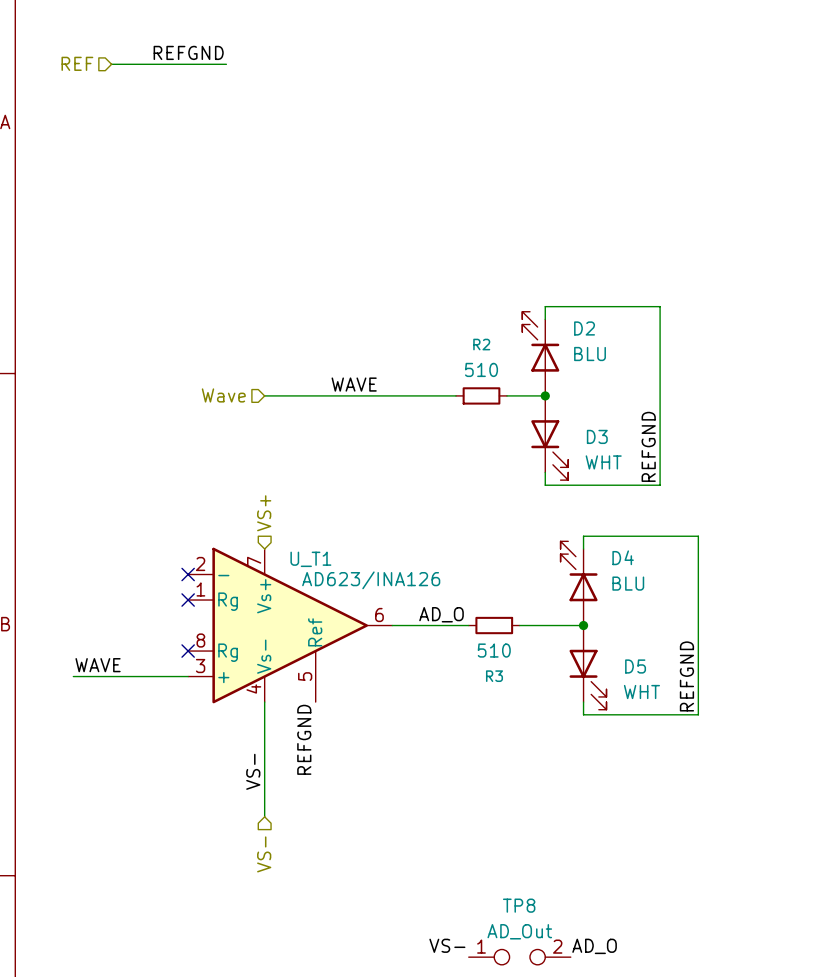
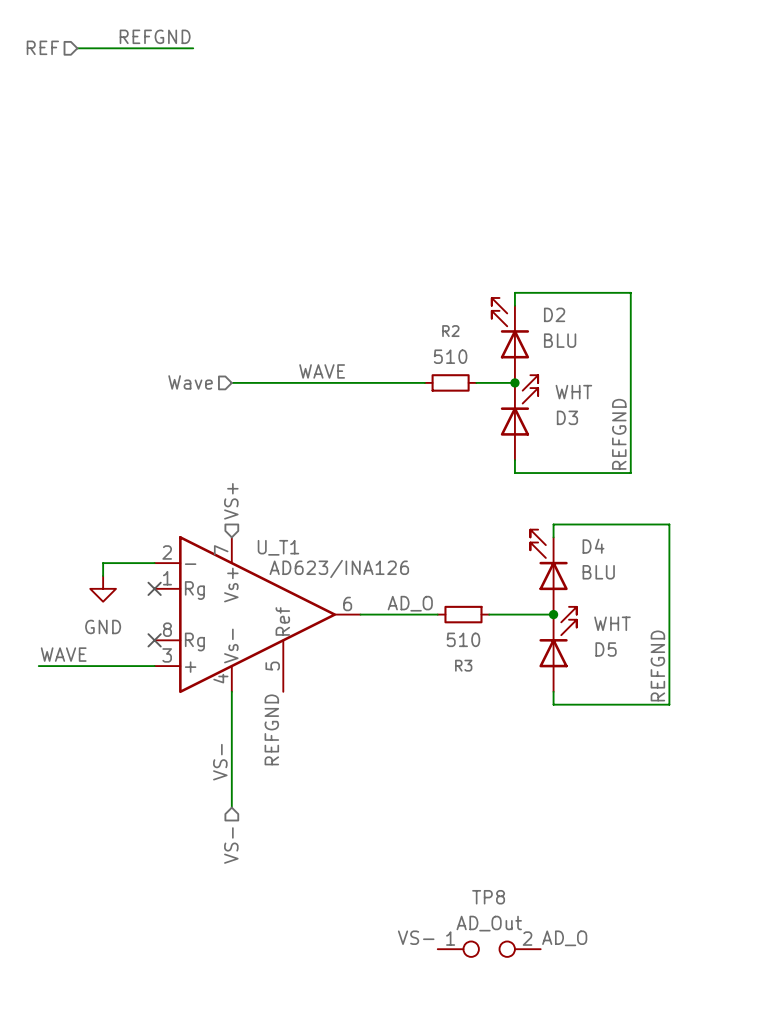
D3 flip: as is (549, 450) -> up-down (519, 405)
wire: none -> (154, 563) (103, 563) (103, 575)
no-connect mark: (188, 574) -> none
power symbol: none -> GND (103, 588)
D5 flip: as is (588, 679) -> up-down (558, 637)

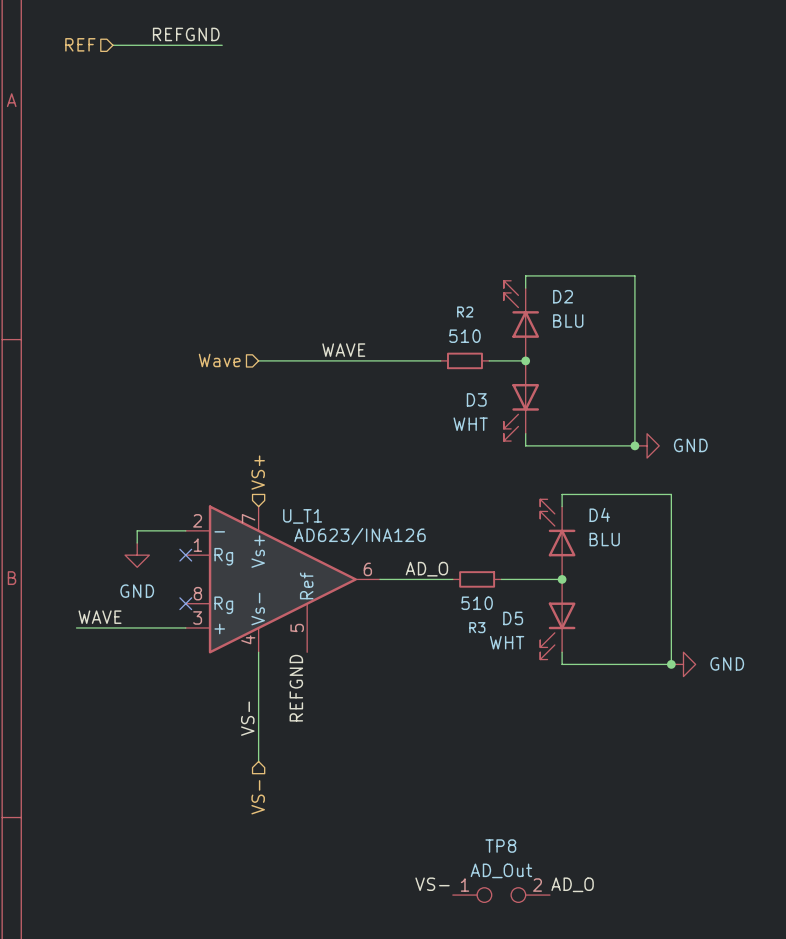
D3 rotation: 0° (519, 405) -> 180° (521, 412)
label: REFGND (619, 434) -> none
junction: none -> (634, 445)
power symbol: none -> GND (647, 445)
D5 rotation: 0° (558, 637) -> 180° (557, 631)
label: REFGND (657, 665) -> none
junction: none -> (671, 664)
power symbol: none -> GND (683, 664)

